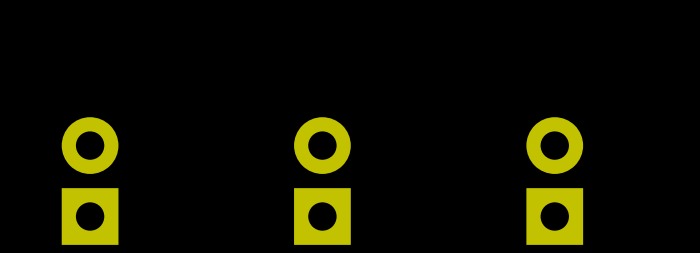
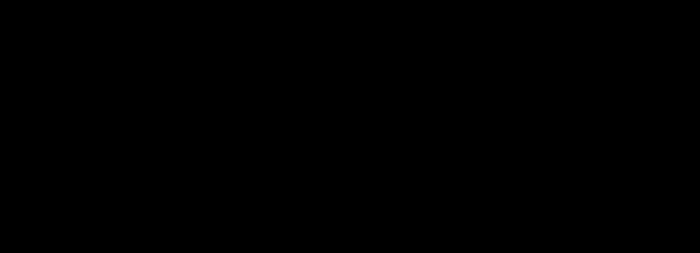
part: (90, 181) -> none
part: (322, 181) -> none
part: (554, 181) -> none

